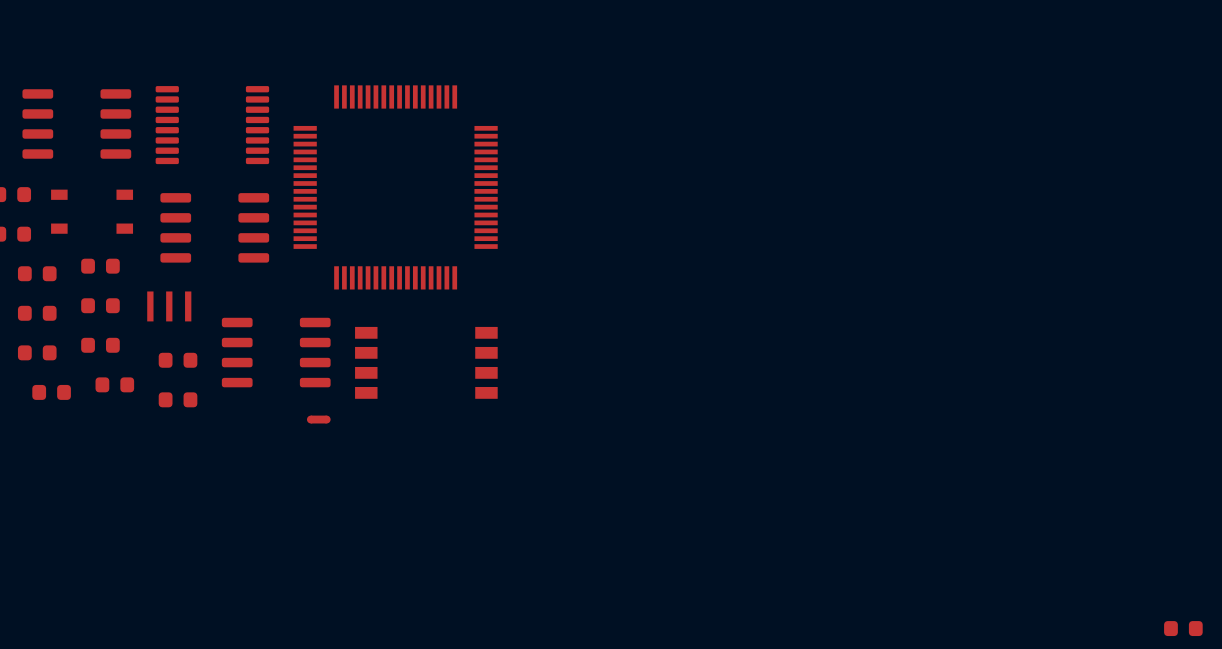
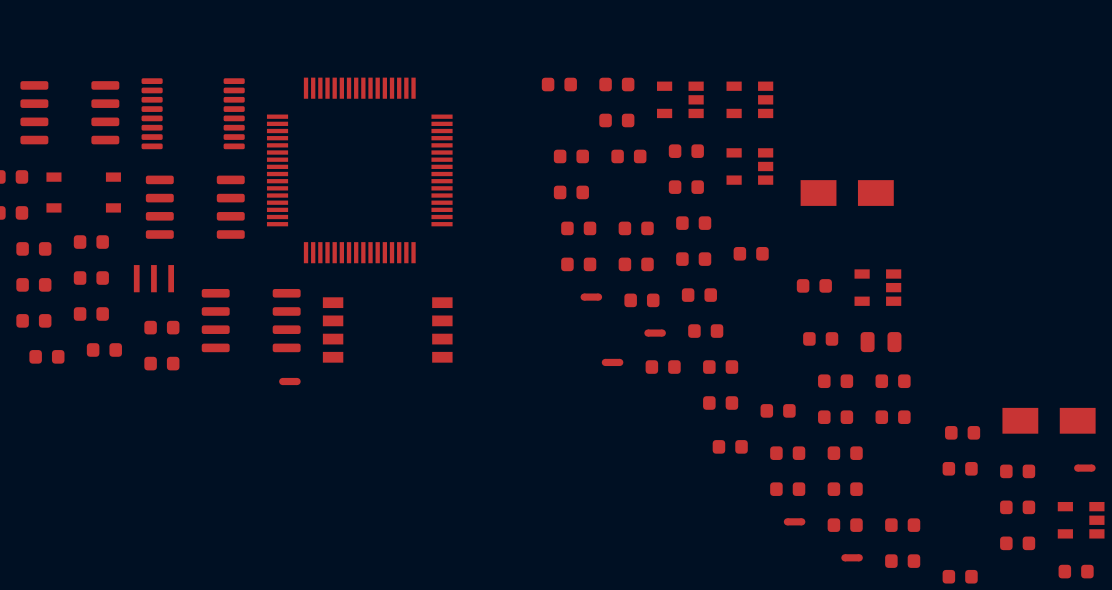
part: none -> (559, 84)
part: none -> (616, 84)
part: none -> (680, 99)
part: none -> (749, 99)
part: none -> (616, 120)
part: none -> (686, 151)
part: none -> (571, 156)
part: none -> (628, 156)
part: none -> (749, 166)
part: none -> (686, 187)
part: none -> (571, 192)
part: none -> (847, 193)
part: none -> (693, 223)
part: none -> (578, 228)
part: none -> (636, 228)
part: none -> (751, 253)
part: none -> (693, 259)
part: none -> (578, 264)
part: none -> (636, 264)
part: none -> (814, 285)
part: none -> (877, 287)
part: none -> (699, 295)
part: none -> (591, 297)
part: none -> (641, 300)
part: none -> (705, 331)
part: none -> (655, 333)
part: none -> (820, 338)
part: none -> (881, 342)
part: none -> (612, 362)
part: none -> (663, 367)
part: none -> (720, 367)
part: none -> (835, 381)
part: none -> (893, 381)
part: none -> (720, 403)
part: none -> (778, 410)
part: none -> (835, 417)
part: none -> (893, 417)
part: none -> (1049, 420)
part: none -> (962, 432)
part: none -> (730, 446)
part: none -> (787, 453)
part: none -> (845, 453)
part: none -> (1084, 468)
part: none -> (960, 468)
part: none -> (1017, 471)
part: none -> (787, 489)
part: none -> (845, 489)
part: none -> (1017, 507)
part: none -> (1081, 520)
part: none -> (794, 521)
part: none -> (845, 525)
part: none -> (902, 525)
part: none -> (1017, 543)
part: none -> (852, 557)
part: none -> (902, 561)
part: none -> (960, 576)

